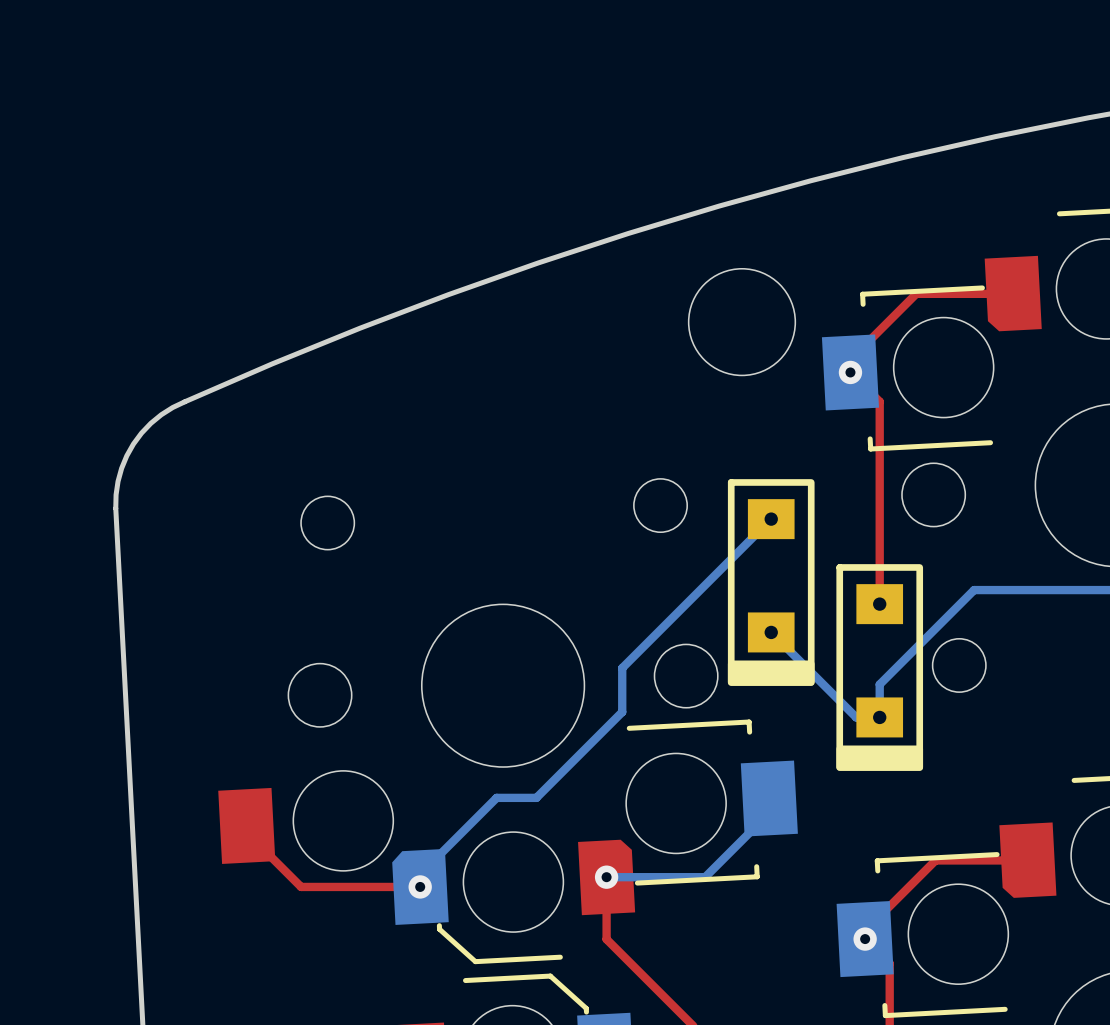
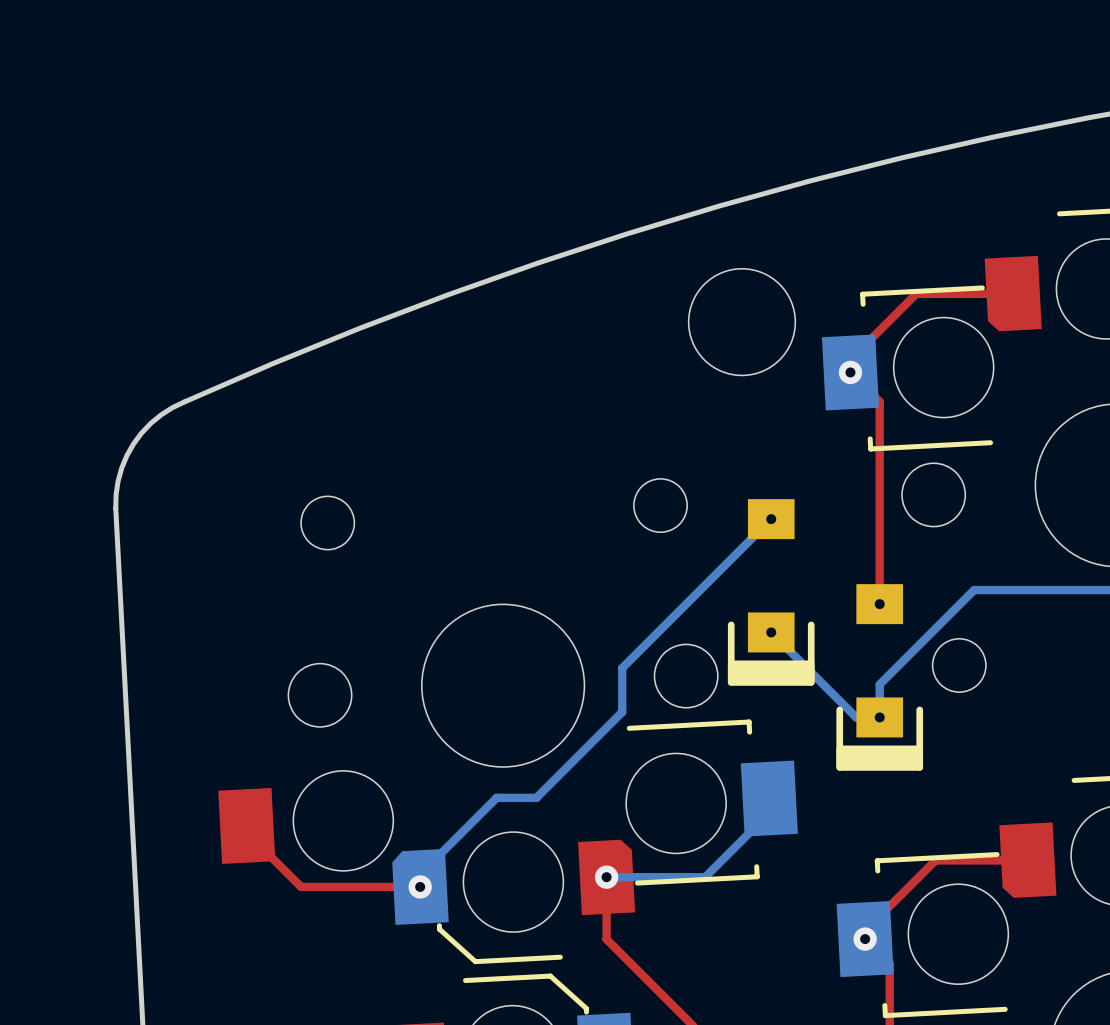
part footprint: [727, 479, 815, 686] -> [727, 499, 815, 686]
part footprint: [836, 564, 924, 771] -> [836, 584, 924, 771]

